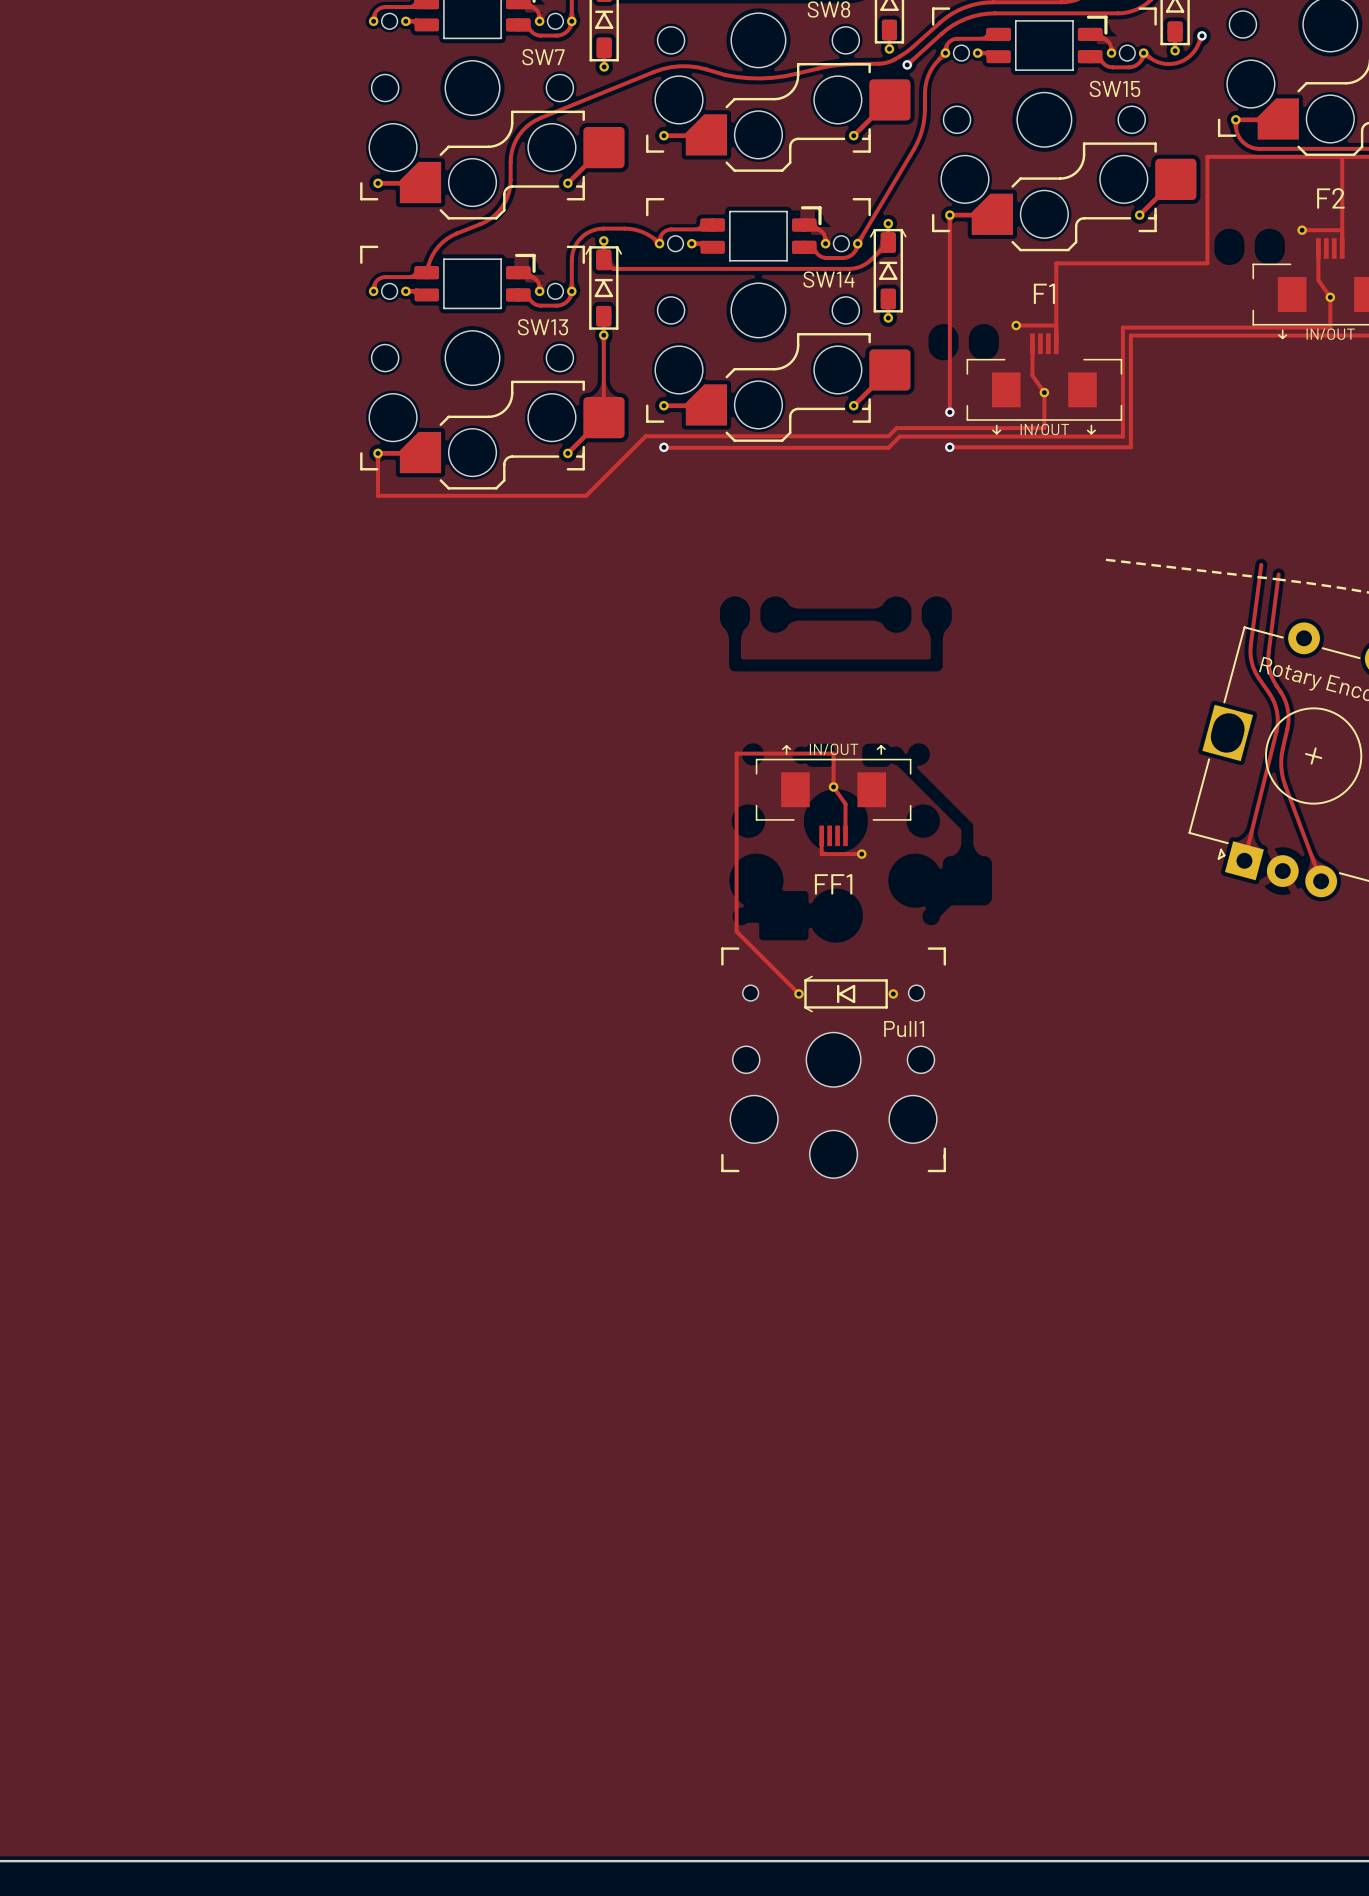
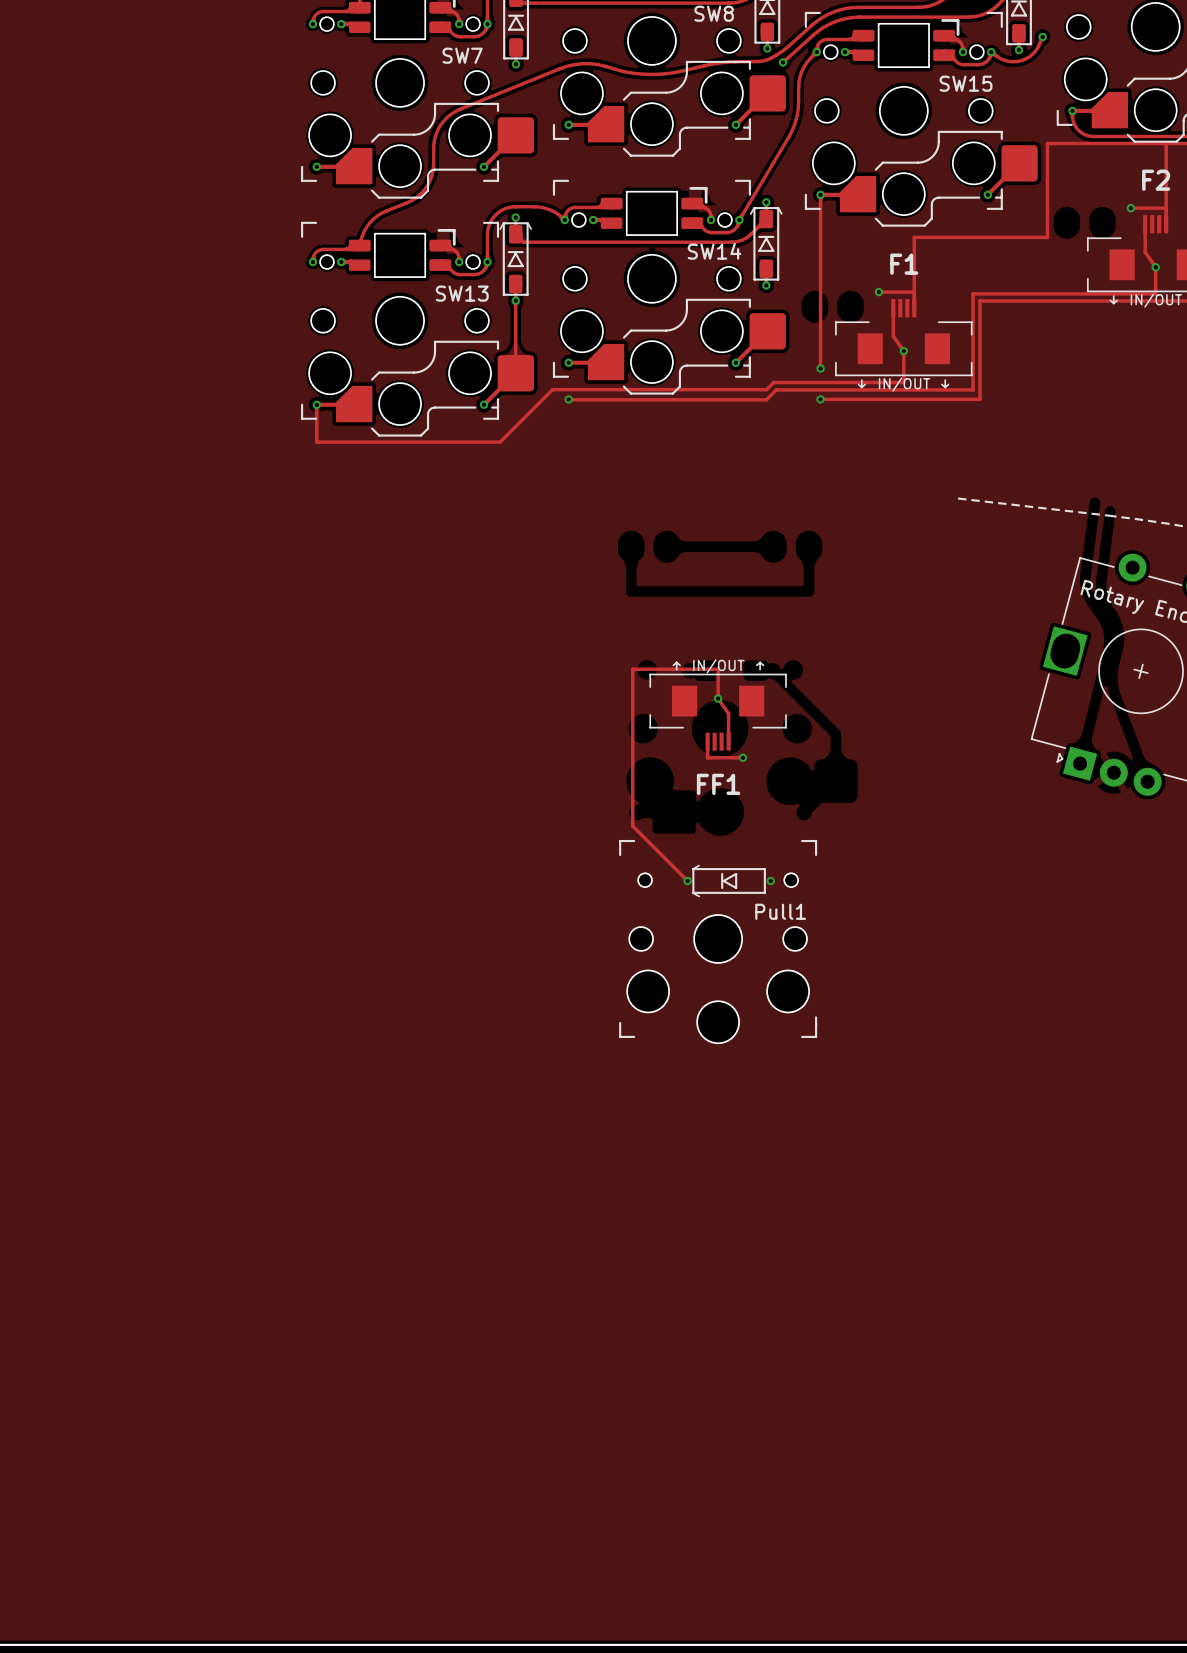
track: (1261, 564) (1250, 656) (1255, 673) (1274, 702) (1277, 721) (1244, 860) -> none
track: (1278, 574) (1268, 658) (1271, 675) (1285, 700) (1288, 714) (1281, 754) (1281, 773) (1321, 881) -> none

